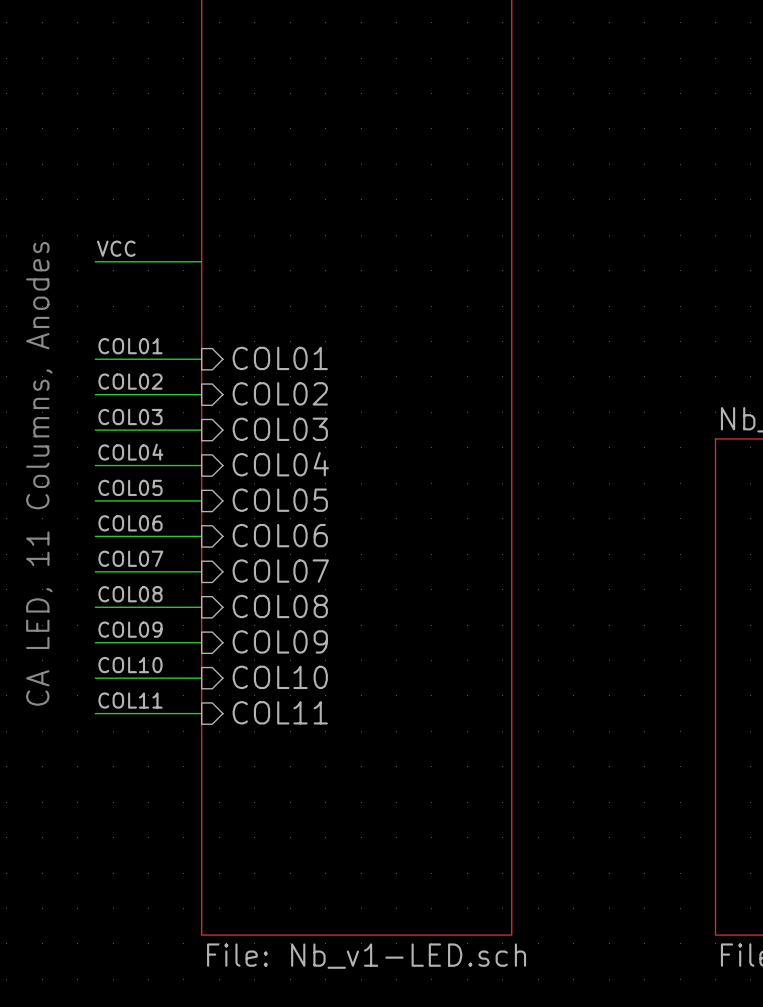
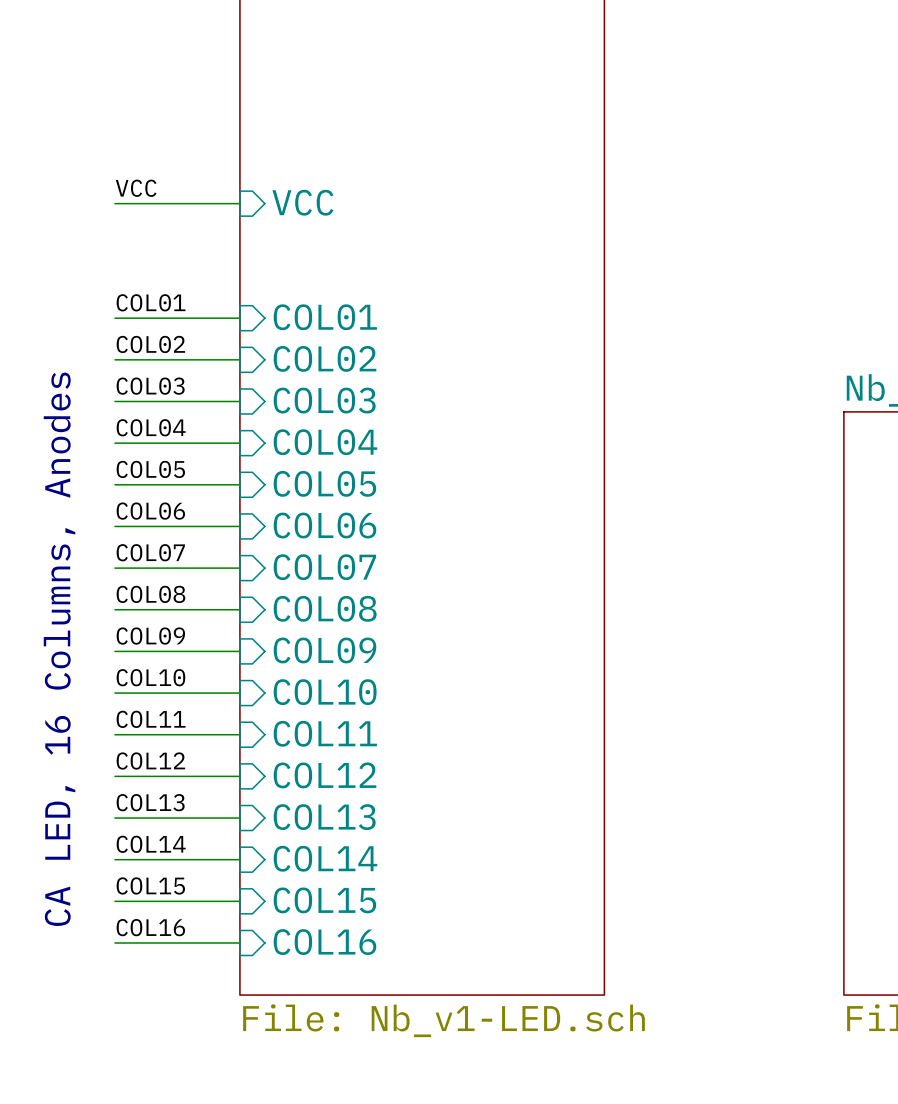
sheet pin: none -> VCC (302, 202)
text: CA LED, 11 Columns, Anodes (39, 473) -> CA LED, 16 Columns, Anodes (59, 649)
label: none -> COL12 (150, 761)
sheet pin: none -> COL12 (325, 775)
wire: none -> (114, 776) (239, 776)
label: none -> COL13 (150, 802)
sheet pin: none -> COL13 (324, 817)
wire: none -> (114, 818) (239, 818)
label: none -> COL14 (151, 844)
sheet pin: none -> COL14 (325, 858)
wire: none -> (114, 859) (239, 859)
label: none -> COL15 (150, 885)
sheet pin: none -> COL15 (324, 900)
wire: none -> (114, 901) (239, 901)
label: none -> COL16 (150, 927)
sheet pin: none -> COL16 (324, 942)
wire: none -> (114, 942) (239, 942)

